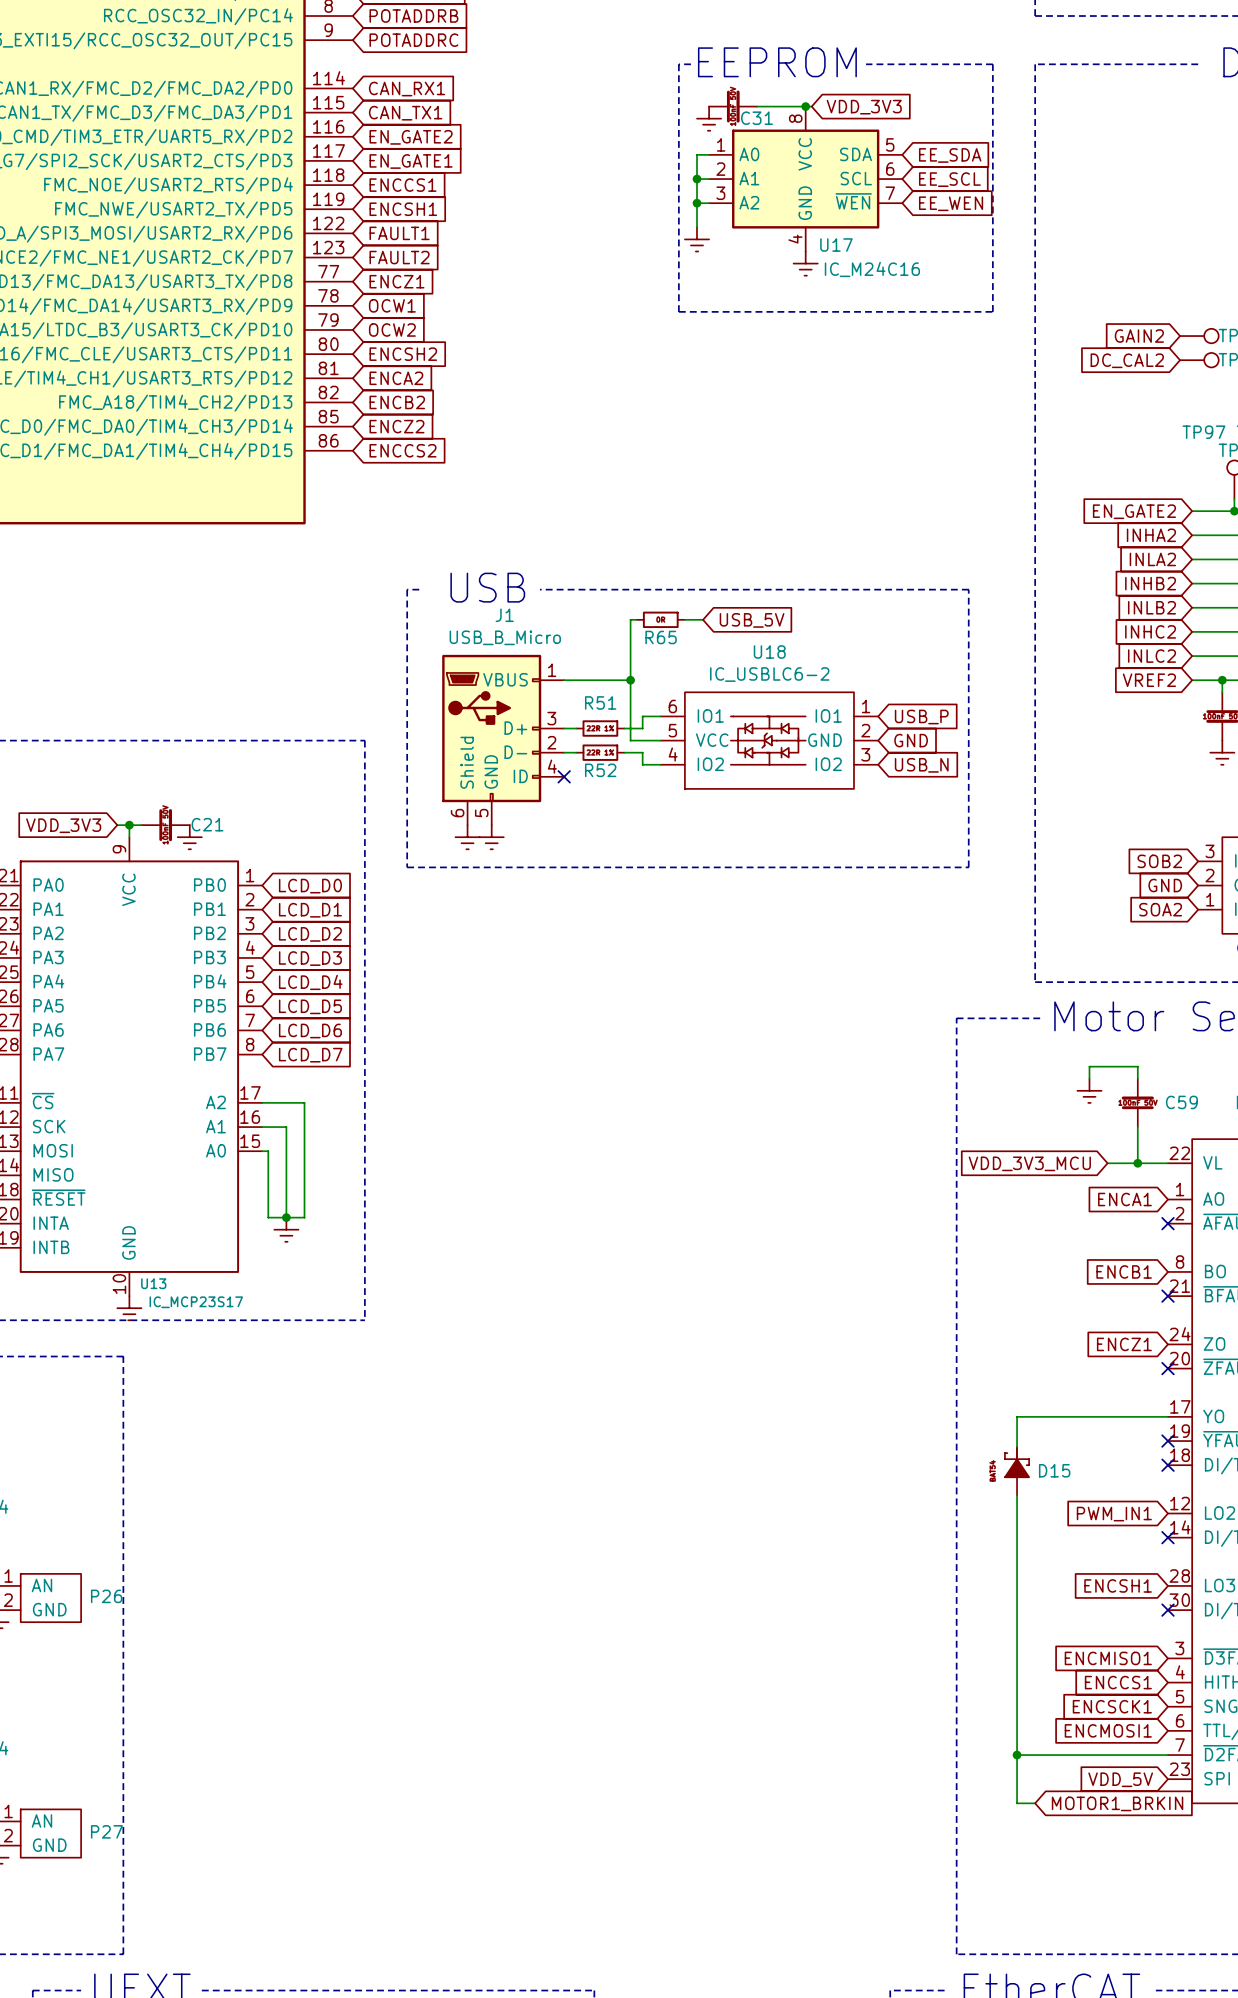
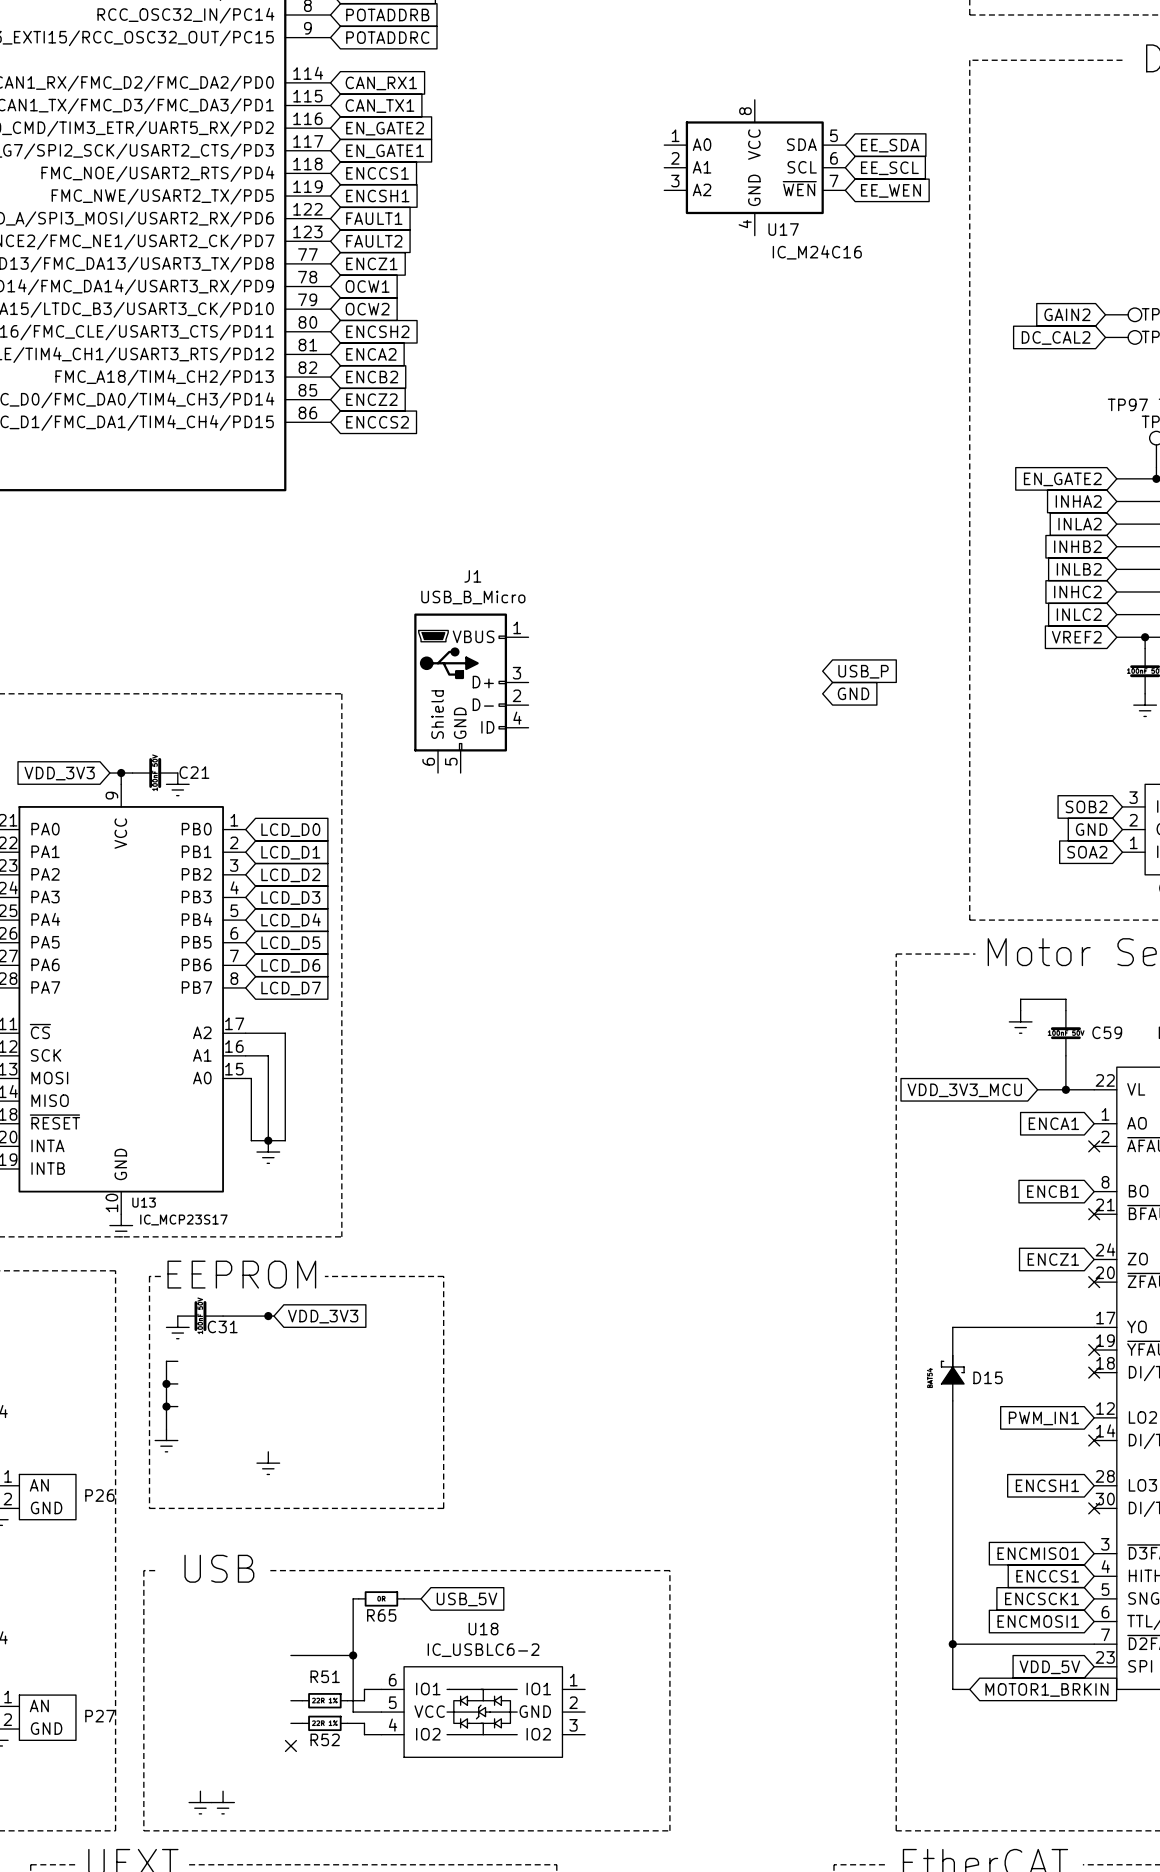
text: EEPROM (777, 62) -> none
line: (690, 64) (678, 64) (678, 311) (992, 311) (992, 64) (866, 64) -> none
C31 position: (733, 106) -> (200, 1316)
wire: (757, 106) (811, 106) -> none
junction: (805, 106) -> none
global label: VDD_3V3 (864, 107) -> none
power symbol: (709, 118) -> none
wire: (709, 154) (697, 154) (697, 227) -> none
wire: (697, 179) (709, 179) -> none
junction: (697, 179) -> none
wire: (697, 203) (709, 203) -> none
junction: (697, 203) -> none
power symbol: (697, 239) -> none
power symbol: (805, 263) -> none
text: USB (487, 587) -> none
line: (419, 589) (407, 589) (407, 867) (968, 867) (968, 589) (540, 589) -> none
wire: (636, 619) (630, 619) (630, 740) (660, 740) -> none
R65 position: (660, 619) -> (381, 1598)
wire: (684, 619) (703, 619) -> none
global label: USB_5V (752, 620) -> none
wire: (564, 680) (630, 680) -> none
junction: (630, 680) -> none
wire: (660, 716) (642, 716) (642, 728) (624, 728) -> none
wire: (564, 728) (576, 728) -> none
R51 position: (600, 728) -> (324, 1700)
U18 position: (769, 740) -> (483, 1712)
wire: (564, 752) (576, 752) -> none
R52 position: (600, 752) -> (324, 1723)
wire: (624, 752) (642, 752) (642, 764) (660, 764) -> none
global label: USB_N (921, 765) -> none
no-connect mark: (564, 776) -> none
power symbol: (467, 837) -> none
power symbol: (491, 837) -> none
text: none -> EEPROM (241, 1274)
line: none -> (160, 1276) (149, 1276) (149, 1508) (443, 1508) (443, 1276) (324, 1276)
wire: none -> (223, 1316) (273, 1316)
junction: none -> (268, 1316)
global label: none -> VDD_3V3 (323, 1316)
power symbol: none -> (177, 1327)
wire: none -> (177, 1361) (166, 1361) (166, 1429)
wire: none -> (166, 1383) (177, 1383)
junction: none -> (166, 1383)
wire: none -> (166, 1406) (177, 1406)
junction: none -> (166, 1406)
power symbol: none -> (166, 1440)
power symbol: none -> (268, 1463)
text: none -> USB (219, 1568)
line: none -> (155, 1570) (143, 1570) (143, 1830) (669, 1830) (669, 1570) (268, 1570)
wire: none -> (358, 1598) (353, 1598) (353, 1712) (381, 1712)
wire: none -> (404, 1598) (421, 1598)
global label: none -> USB_5V (466, 1599)
wire: none -> (290, 1655) (353, 1655)
junction: none -> (353, 1655)
wire: none -> (381, 1689) (364, 1689) (364, 1700) (347, 1700)
wire: none -> (290, 1700) (302, 1700)
wire: none -> (290, 1723) (302, 1723)
wire: none -> (347, 1723) (364, 1723) (364, 1734) (381, 1734)
no-connect mark: none -> (290, 1745)
power symbol: none -> (200, 1802)
power symbol: none -> (223, 1802)

